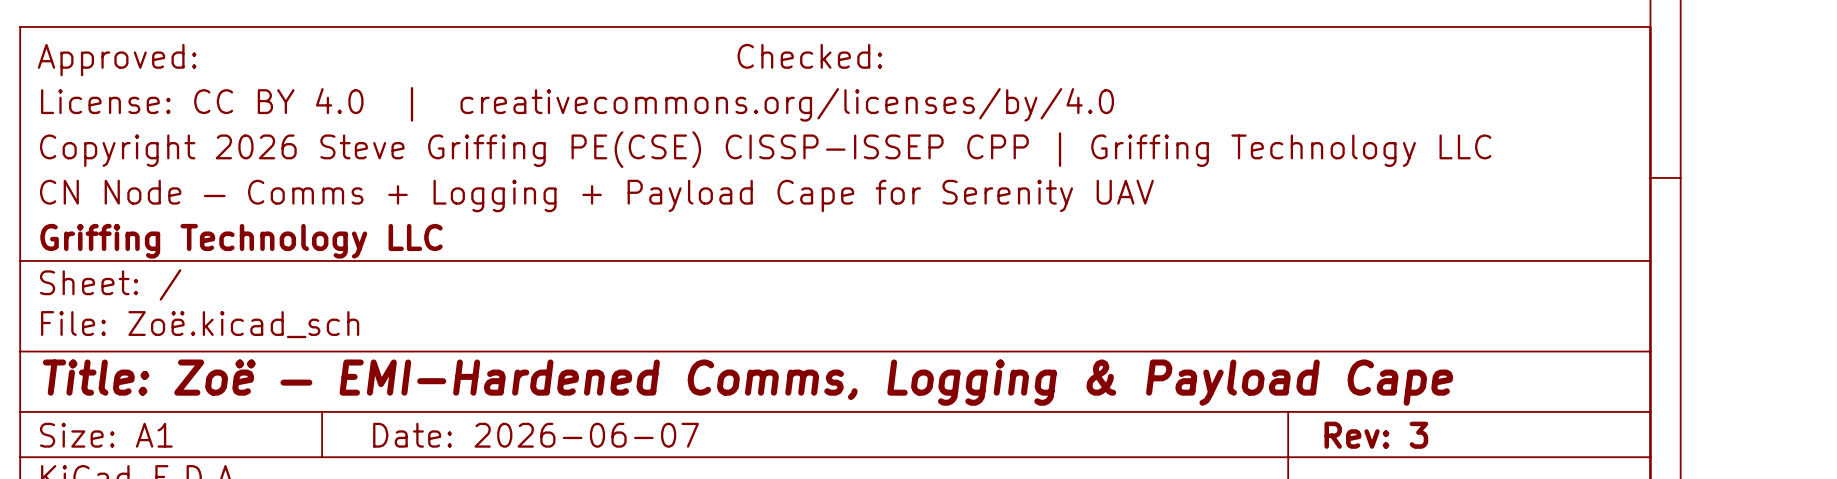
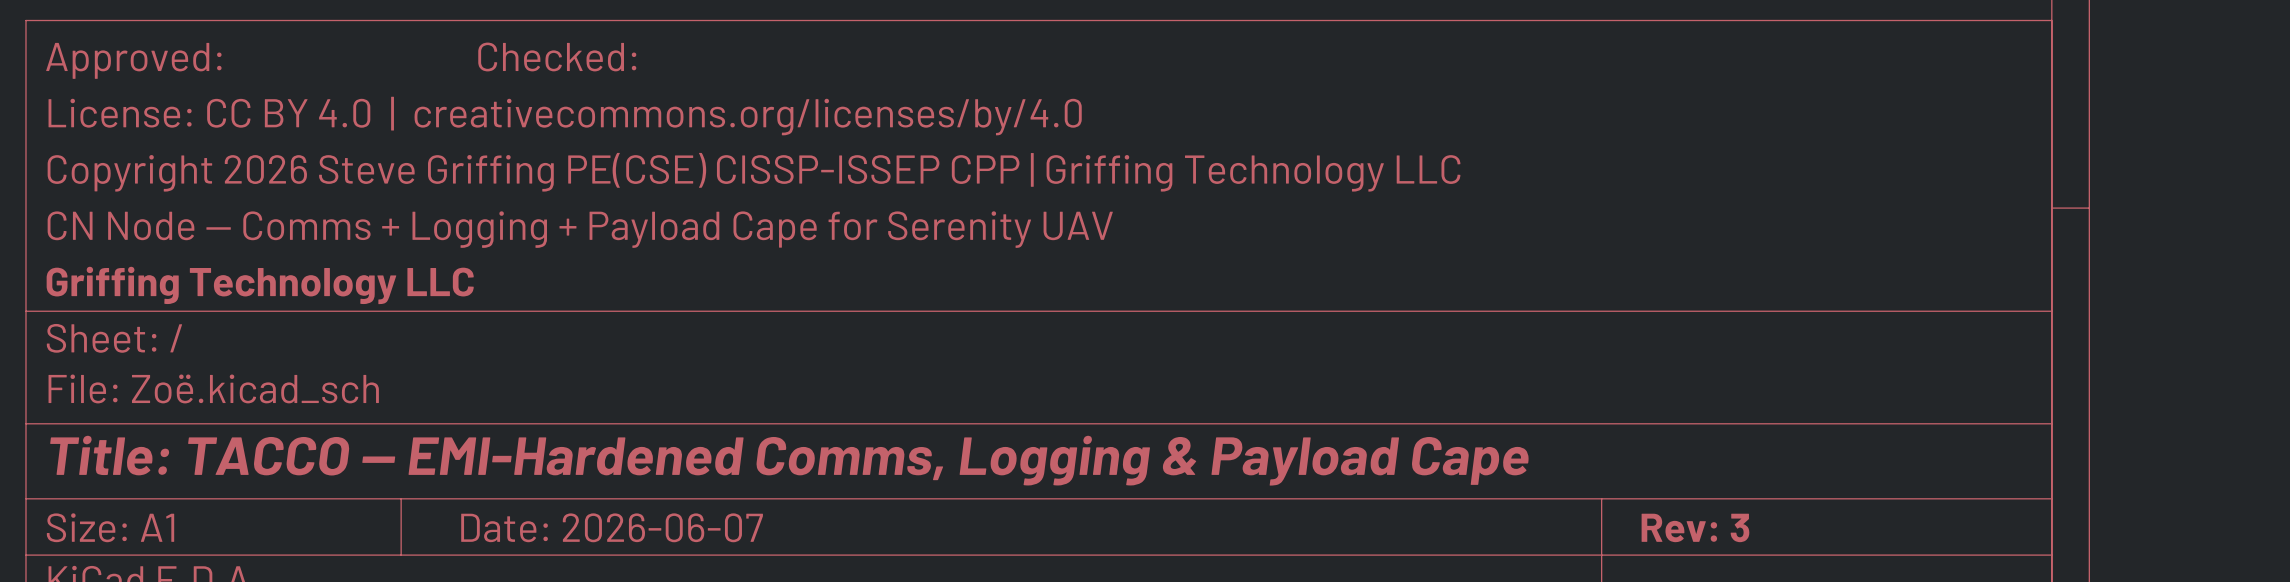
title block: Title: Zoë — EMI-Hardened Comms, Logging & Payload Cape (748, 382) -> Title: TACCO — EMI-Hardened Comms, Logging & Payload Cape (789, 460)

